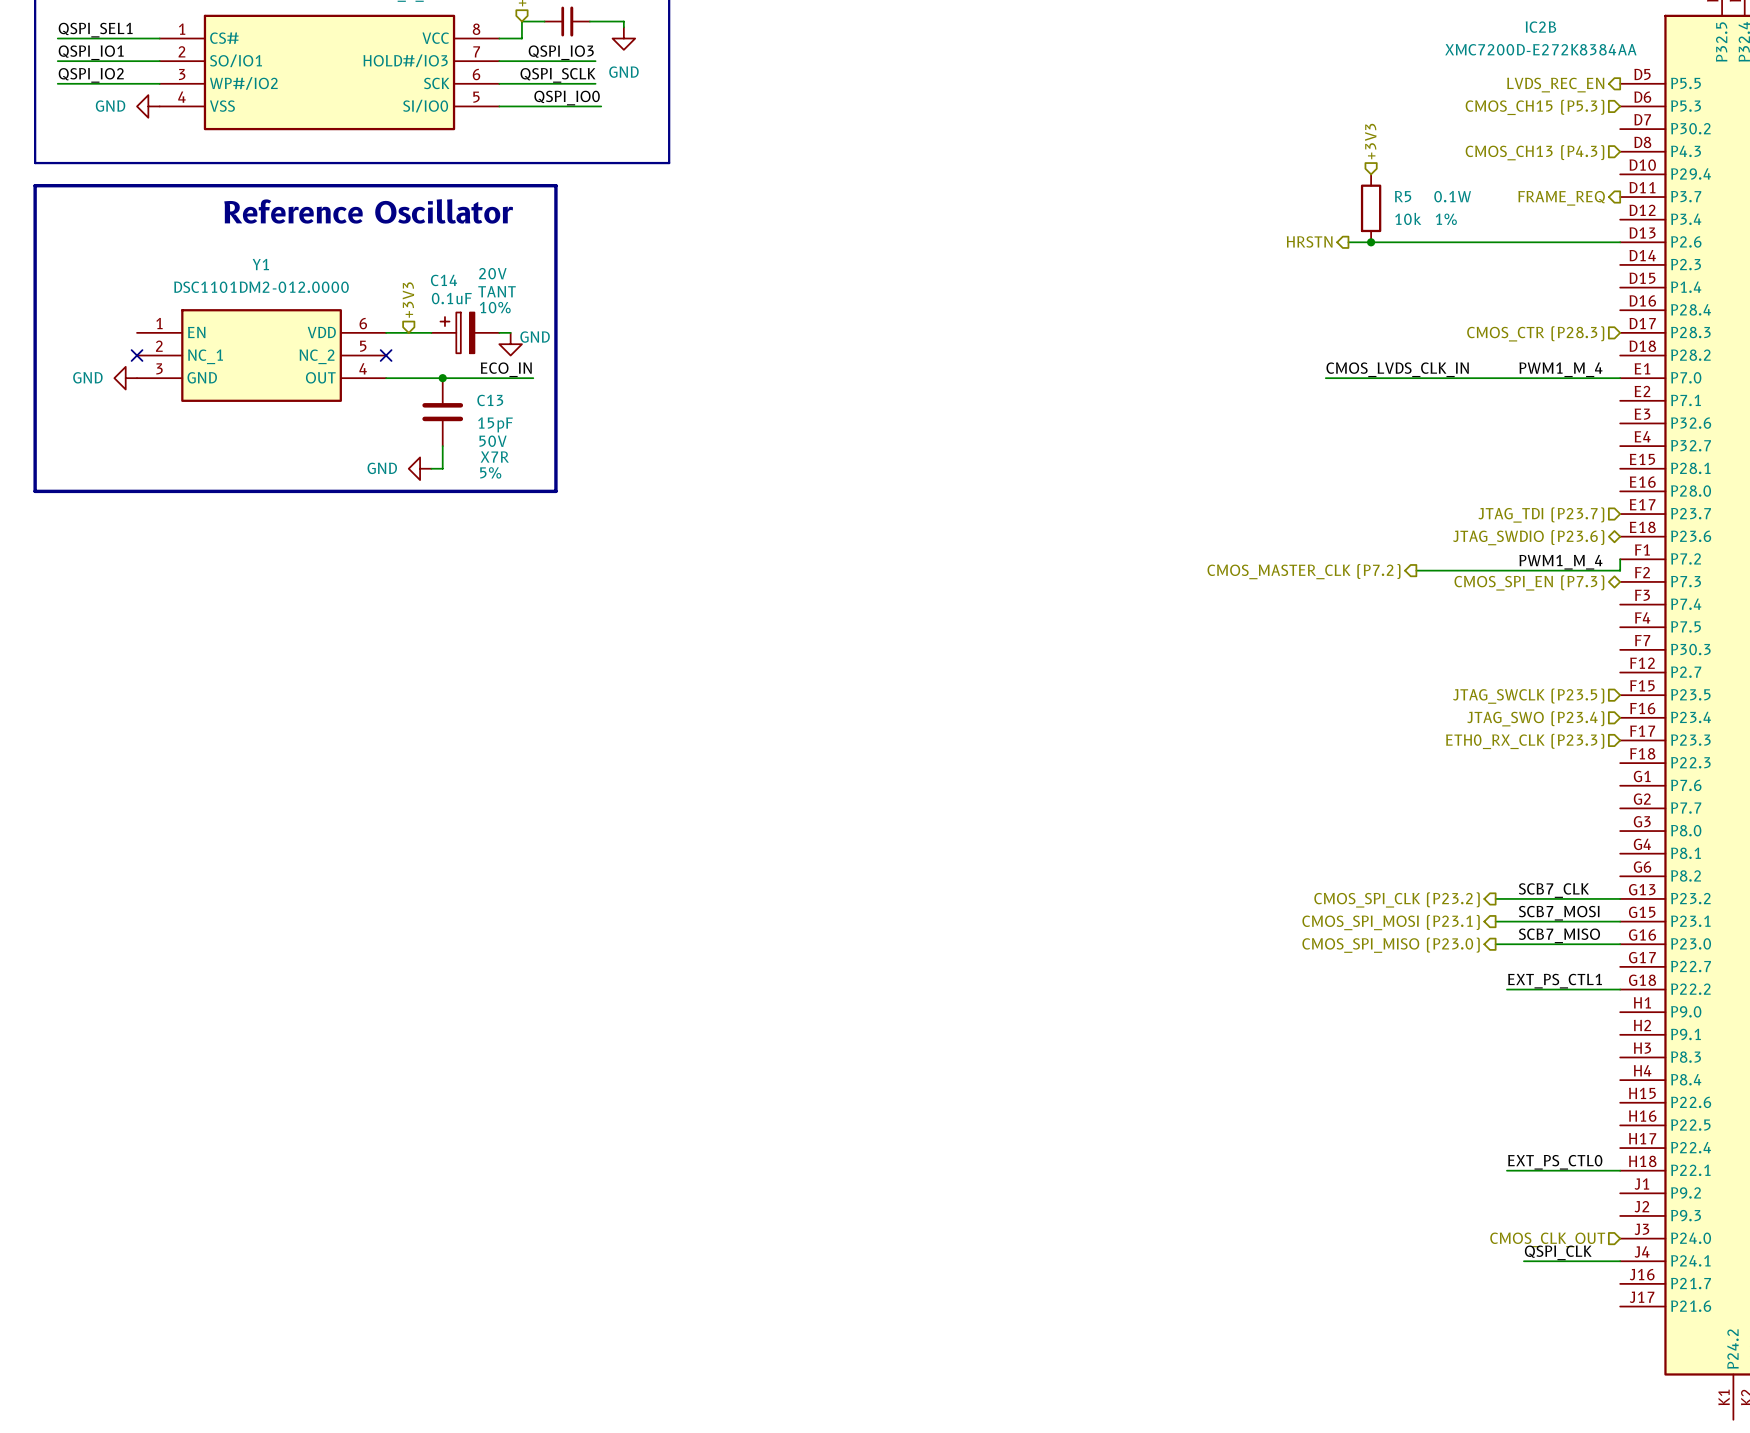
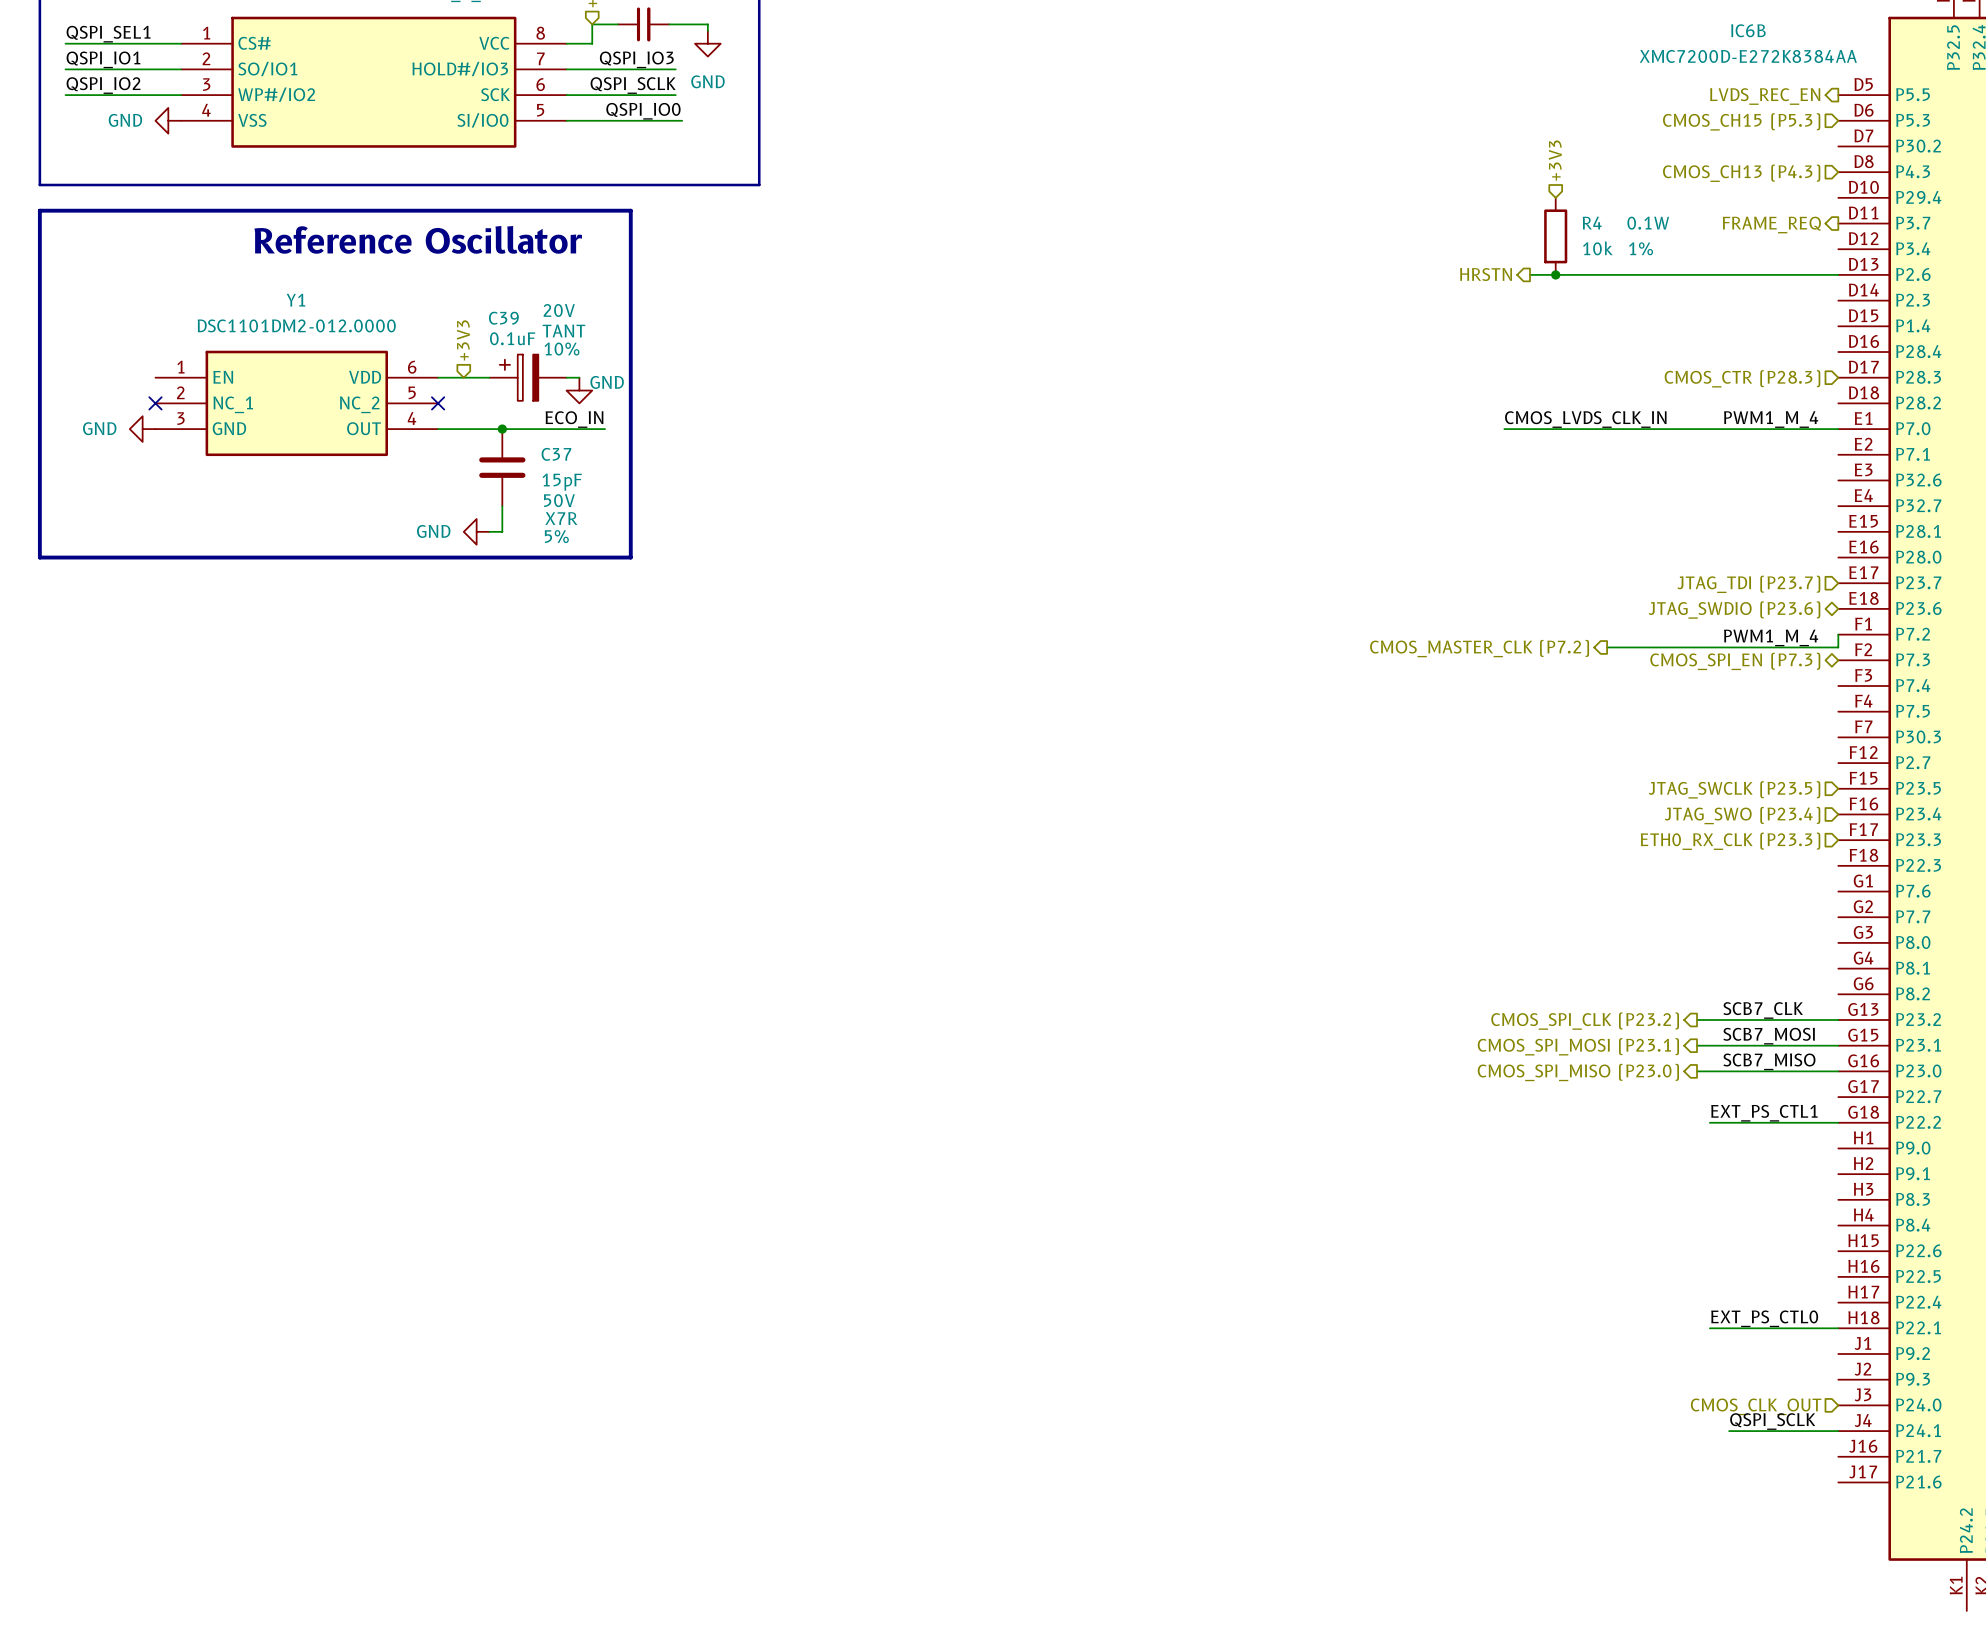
IC2B name: IC2B (1540, 27) -> IC6B (1748, 30)
R5 name: R5 (1403, 196) -> R4 (1592, 223)
C14 name: C14 (444, 280) -> C39 (503, 318)
C13 name: C13 (490, 400) -> C37 (556, 454)
label: QSPI_CLK (1558, 1252) -> QSPI_SCLK (1772, 1421)

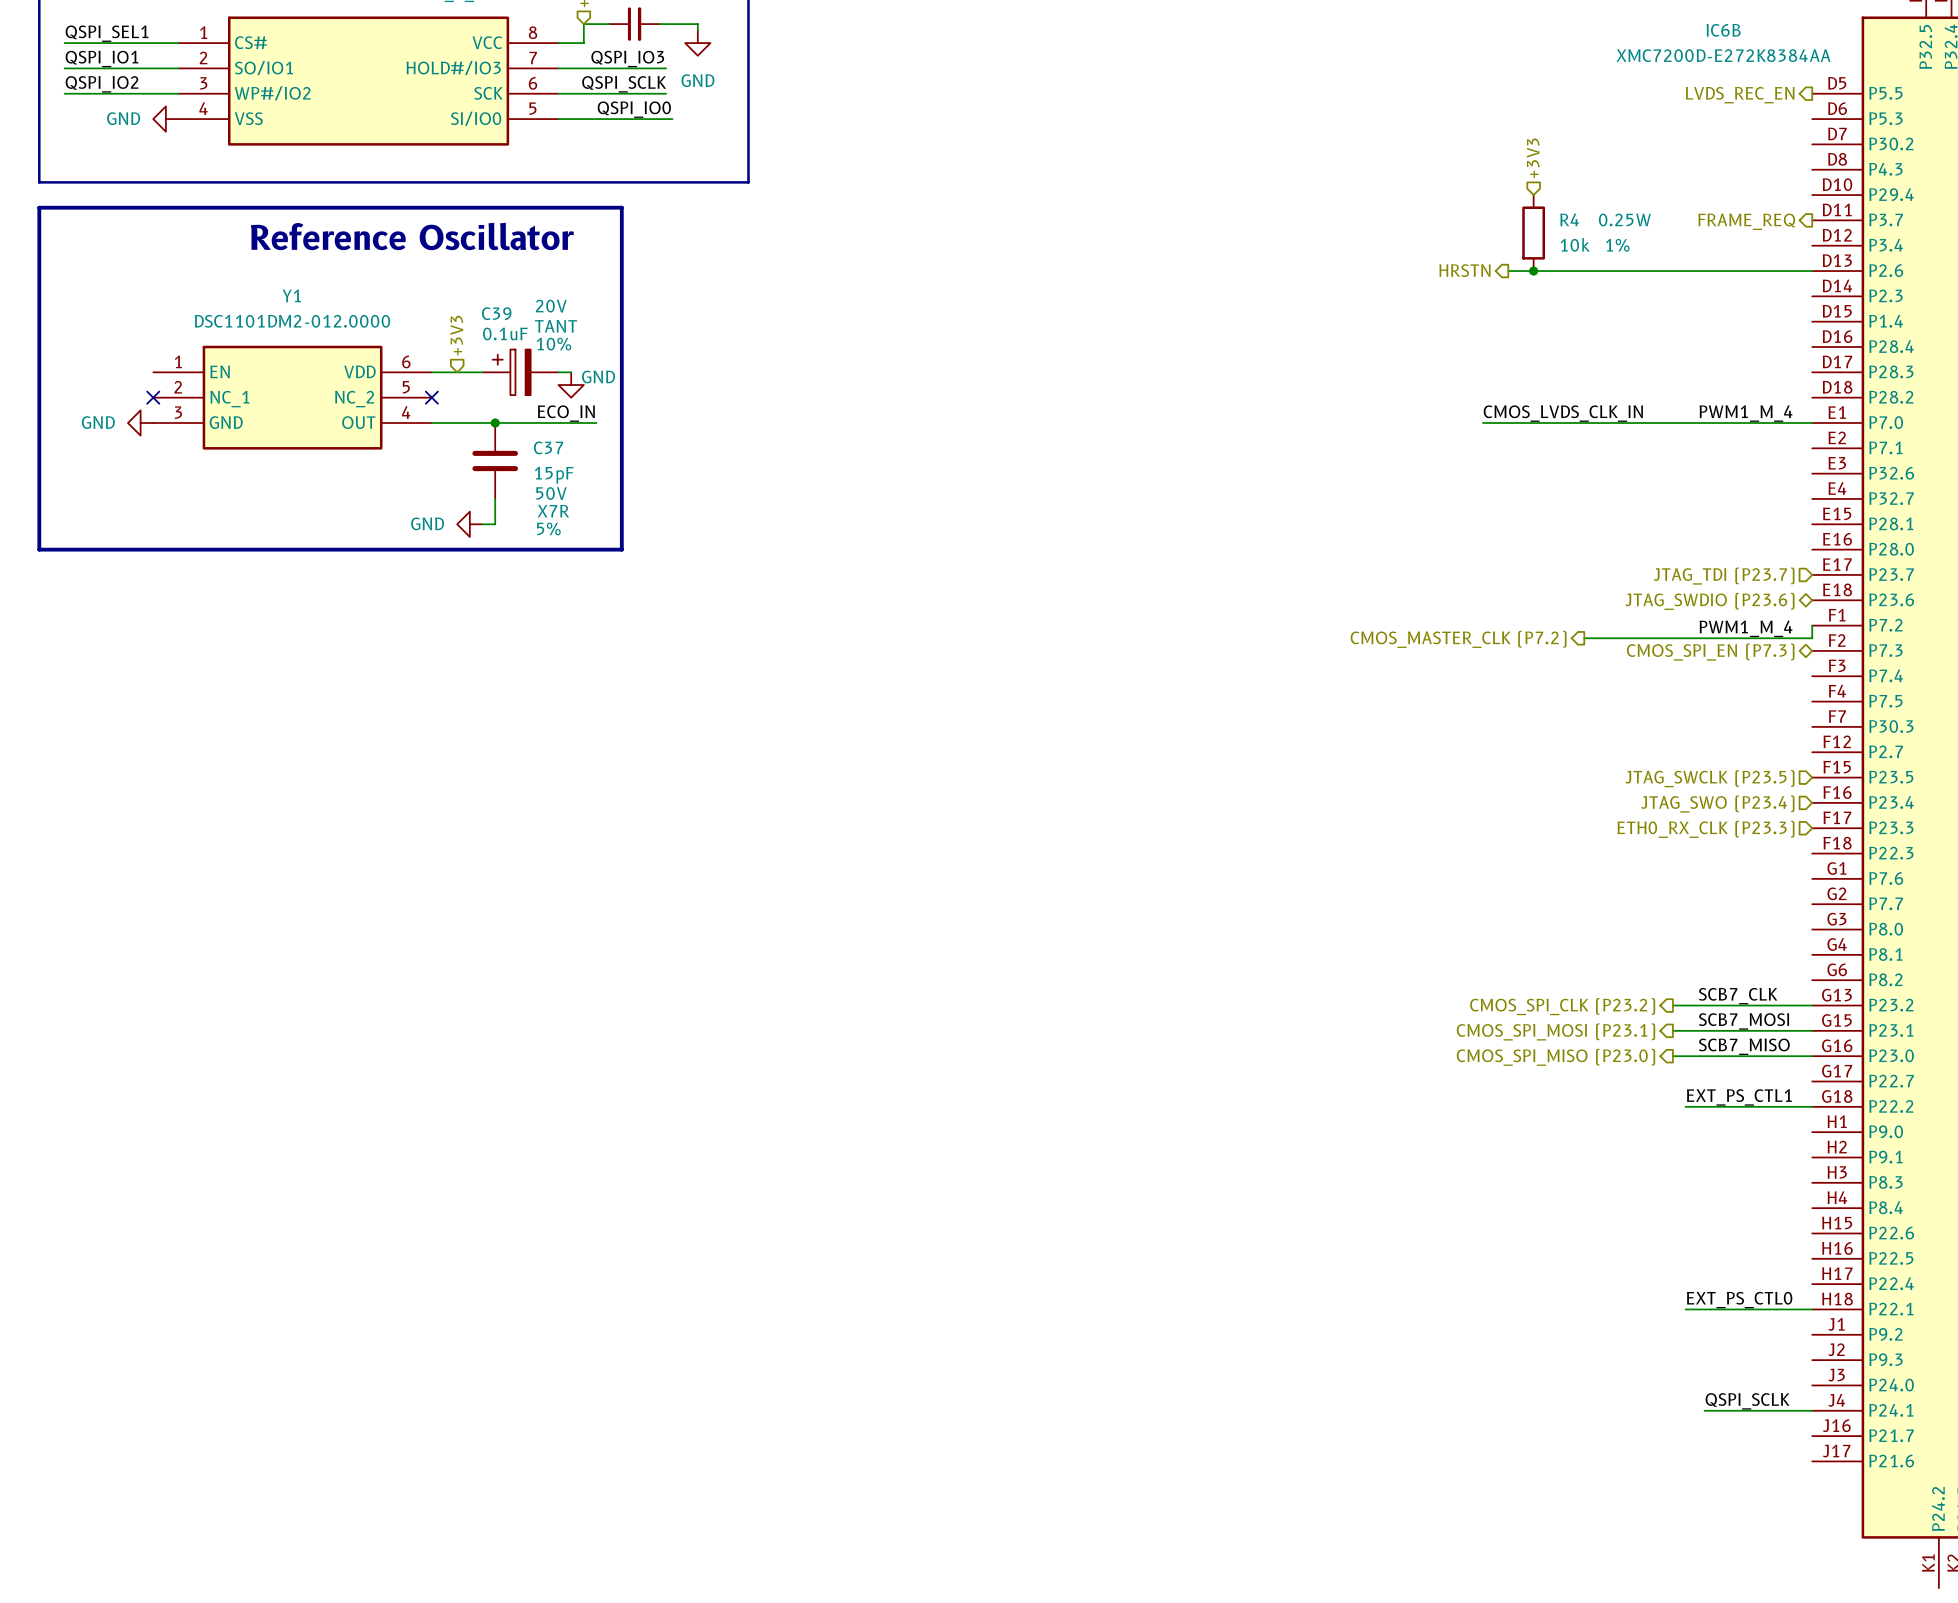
hierarchical label: CMOS_CH15 (P5.3) (1741, 121) -> none
hierarchical label: CMOS_CH13 (P4.3) (1741, 173) -> none
R4 text: 0.1W (1648, 223) -> 0.25W (1624, 219)
hierarchical label: CMOS_CTR (P28.3) (1742, 378) -> none
hierarchical label: CMOS_CLK_OUT (1756, 1406) -> none

